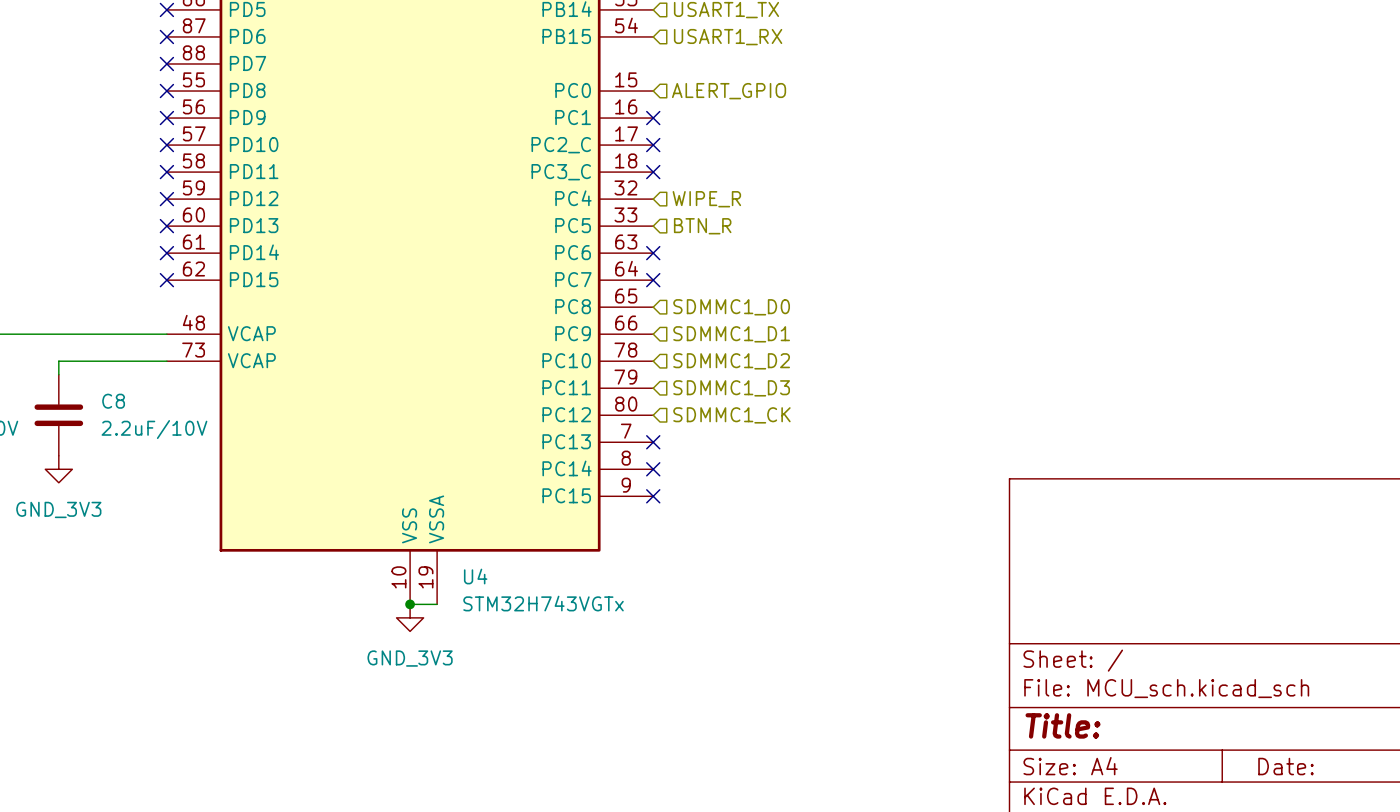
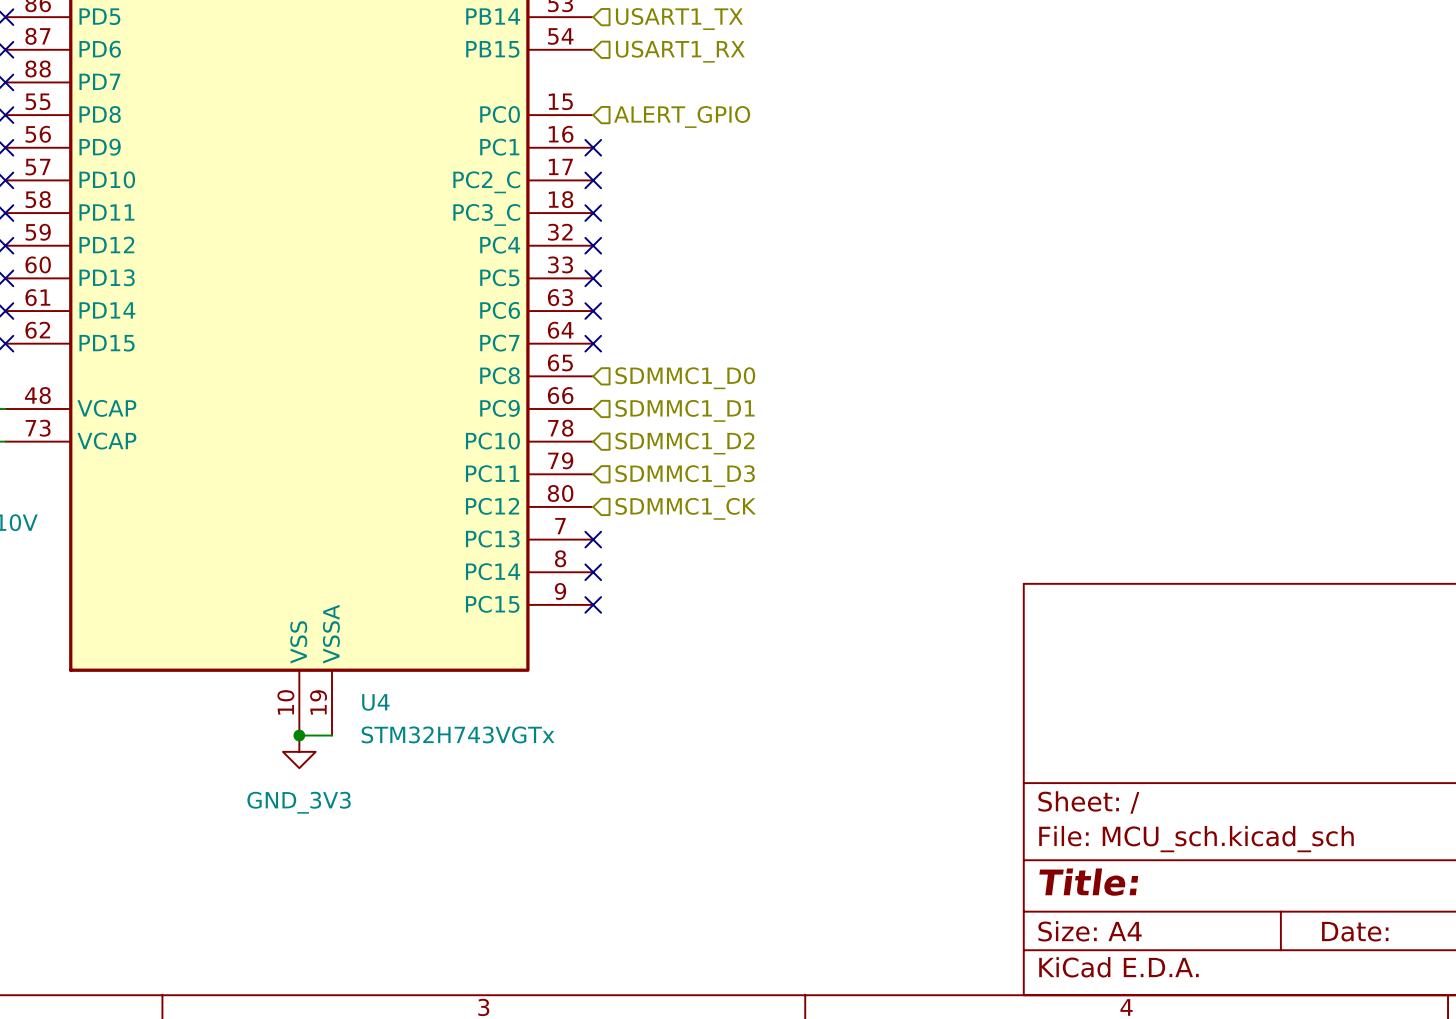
no-connect mark: none -> (593, 245)
hierarchical label: WIPE_R (706, 199) -> none
no-connect mark: none -> (593, 278)
hierarchical label: BTN_R (702, 226) -> none

